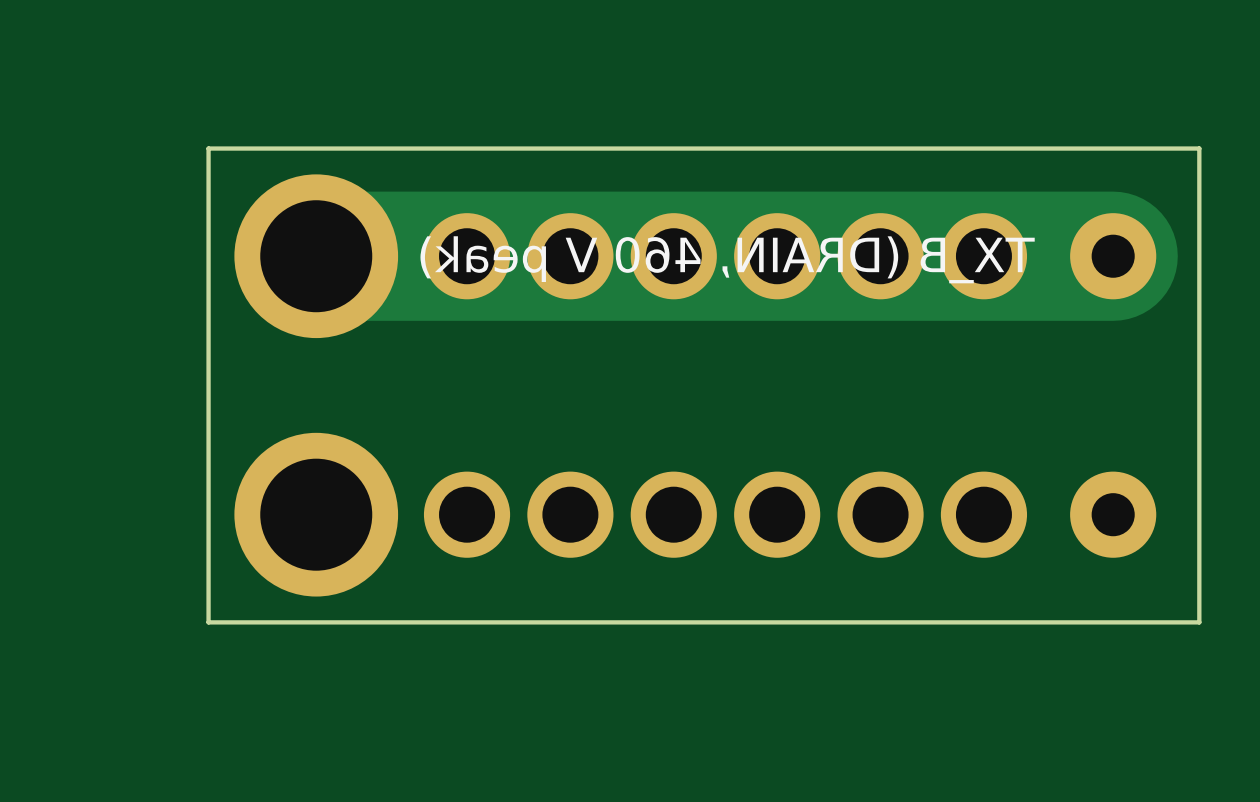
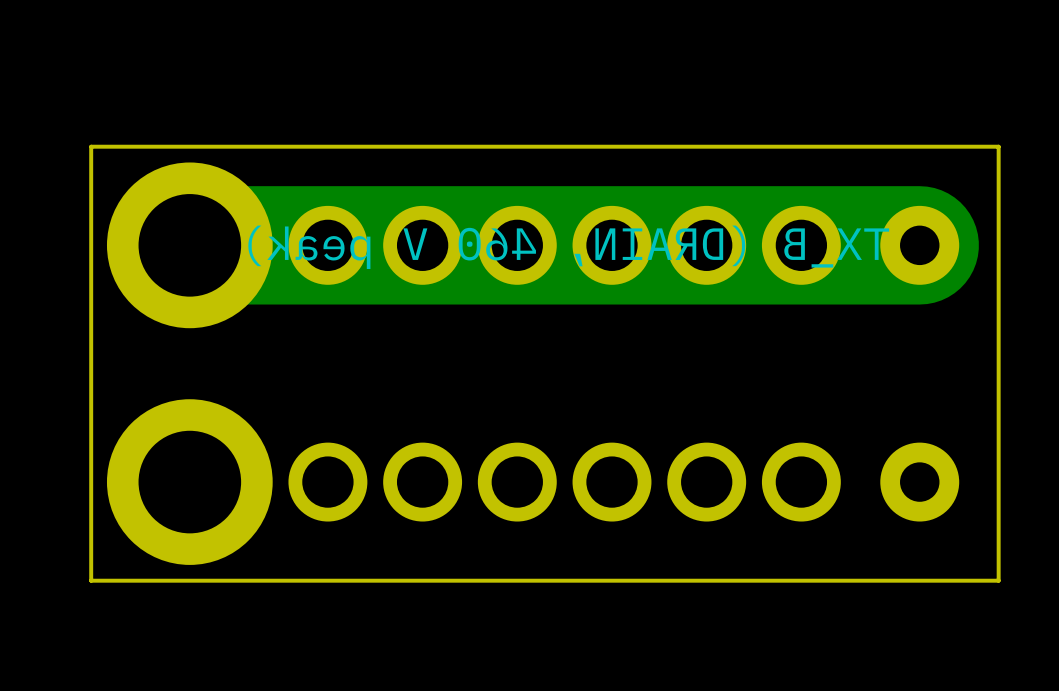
part footprint: [234, 174, 399, 339] -> [106, 162, 273, 329]
part footprint: [234, 432, 399, 597] -> [106, 399, 273, 565]

